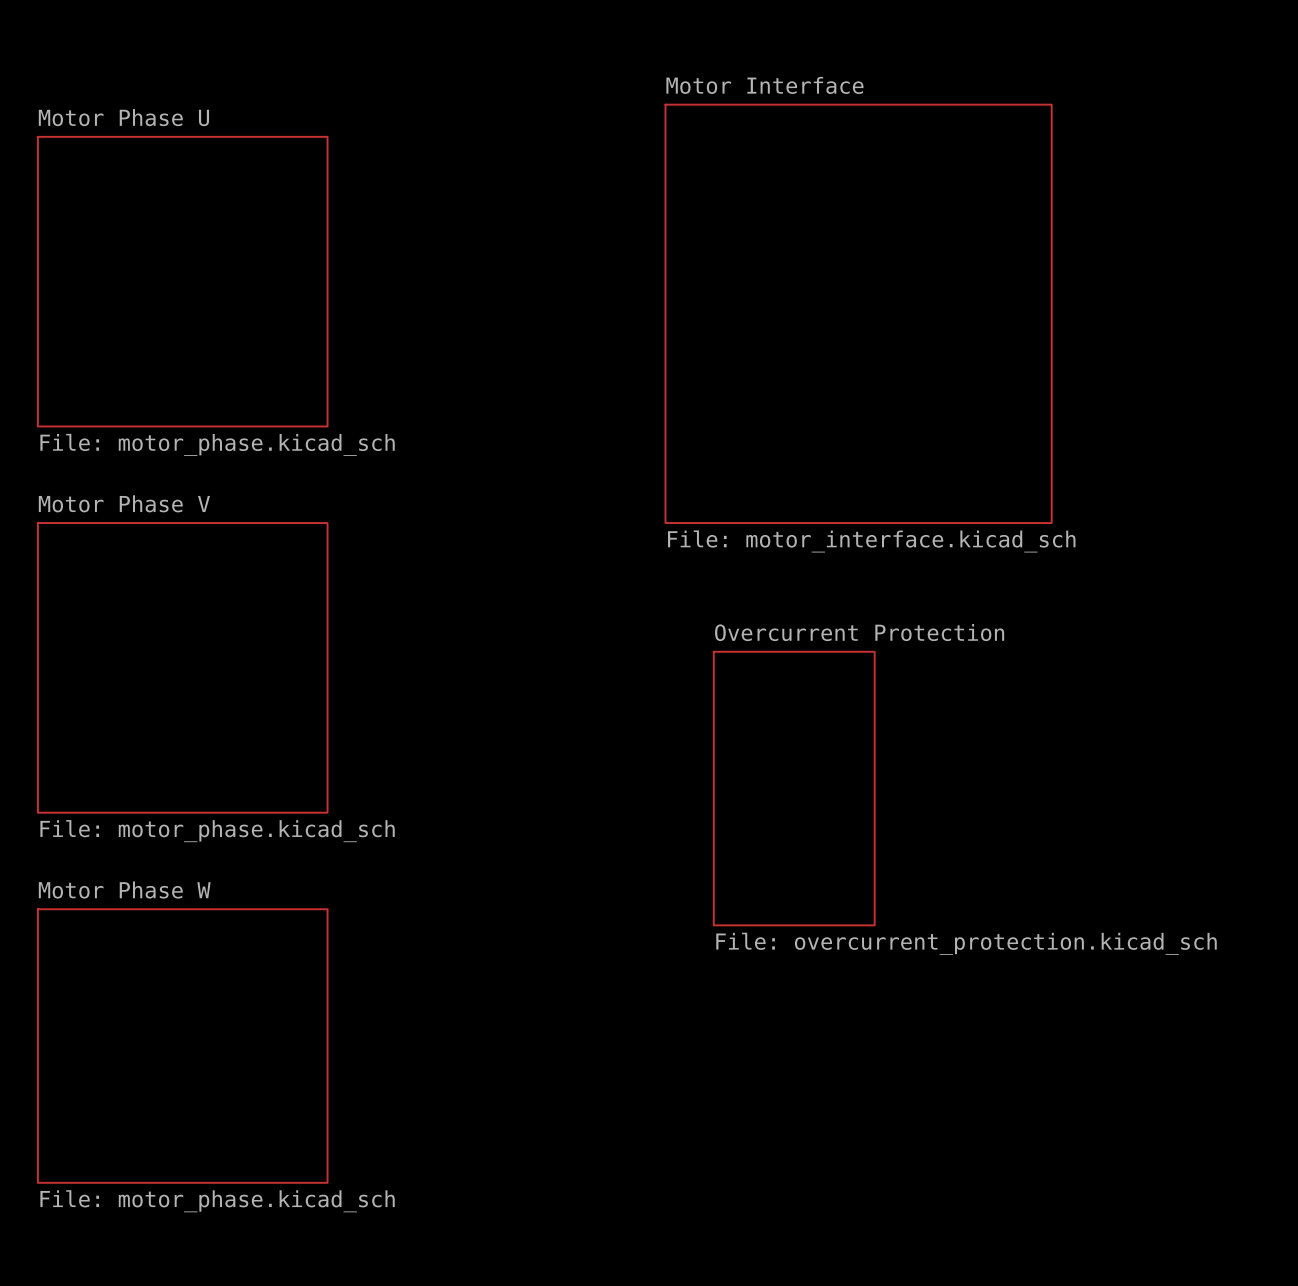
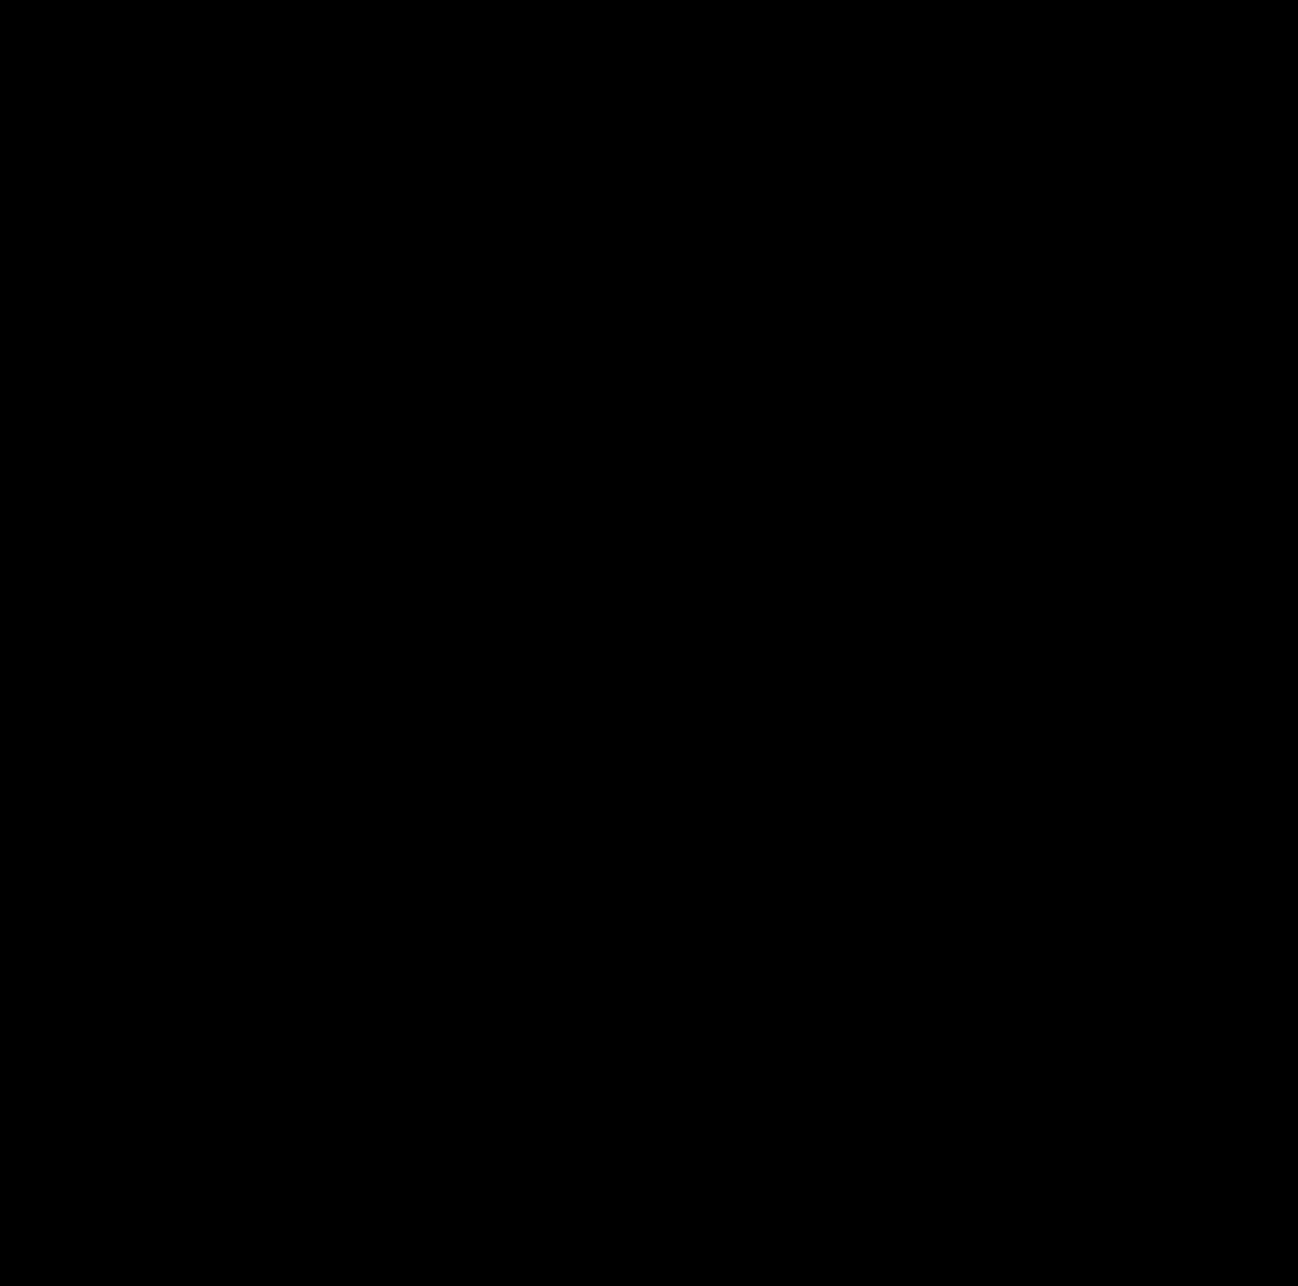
sheet Motor Phase U: File: motor_phase.kicad_sch (182, 281) -> none
sheet Motor Interface: File: motor_interface.kicad_sch (858, 313) -> none
sheet Motor Phase V: File: motor_phase.kicad_sch (182, 667) -> none
sheet Overcurrent Protection: File: overcurrent_protection.kicad_sch (794, 788) -> none
sheet Motor Phase W: File: motor_phase.kicad_sch (182, 1046) -> none

